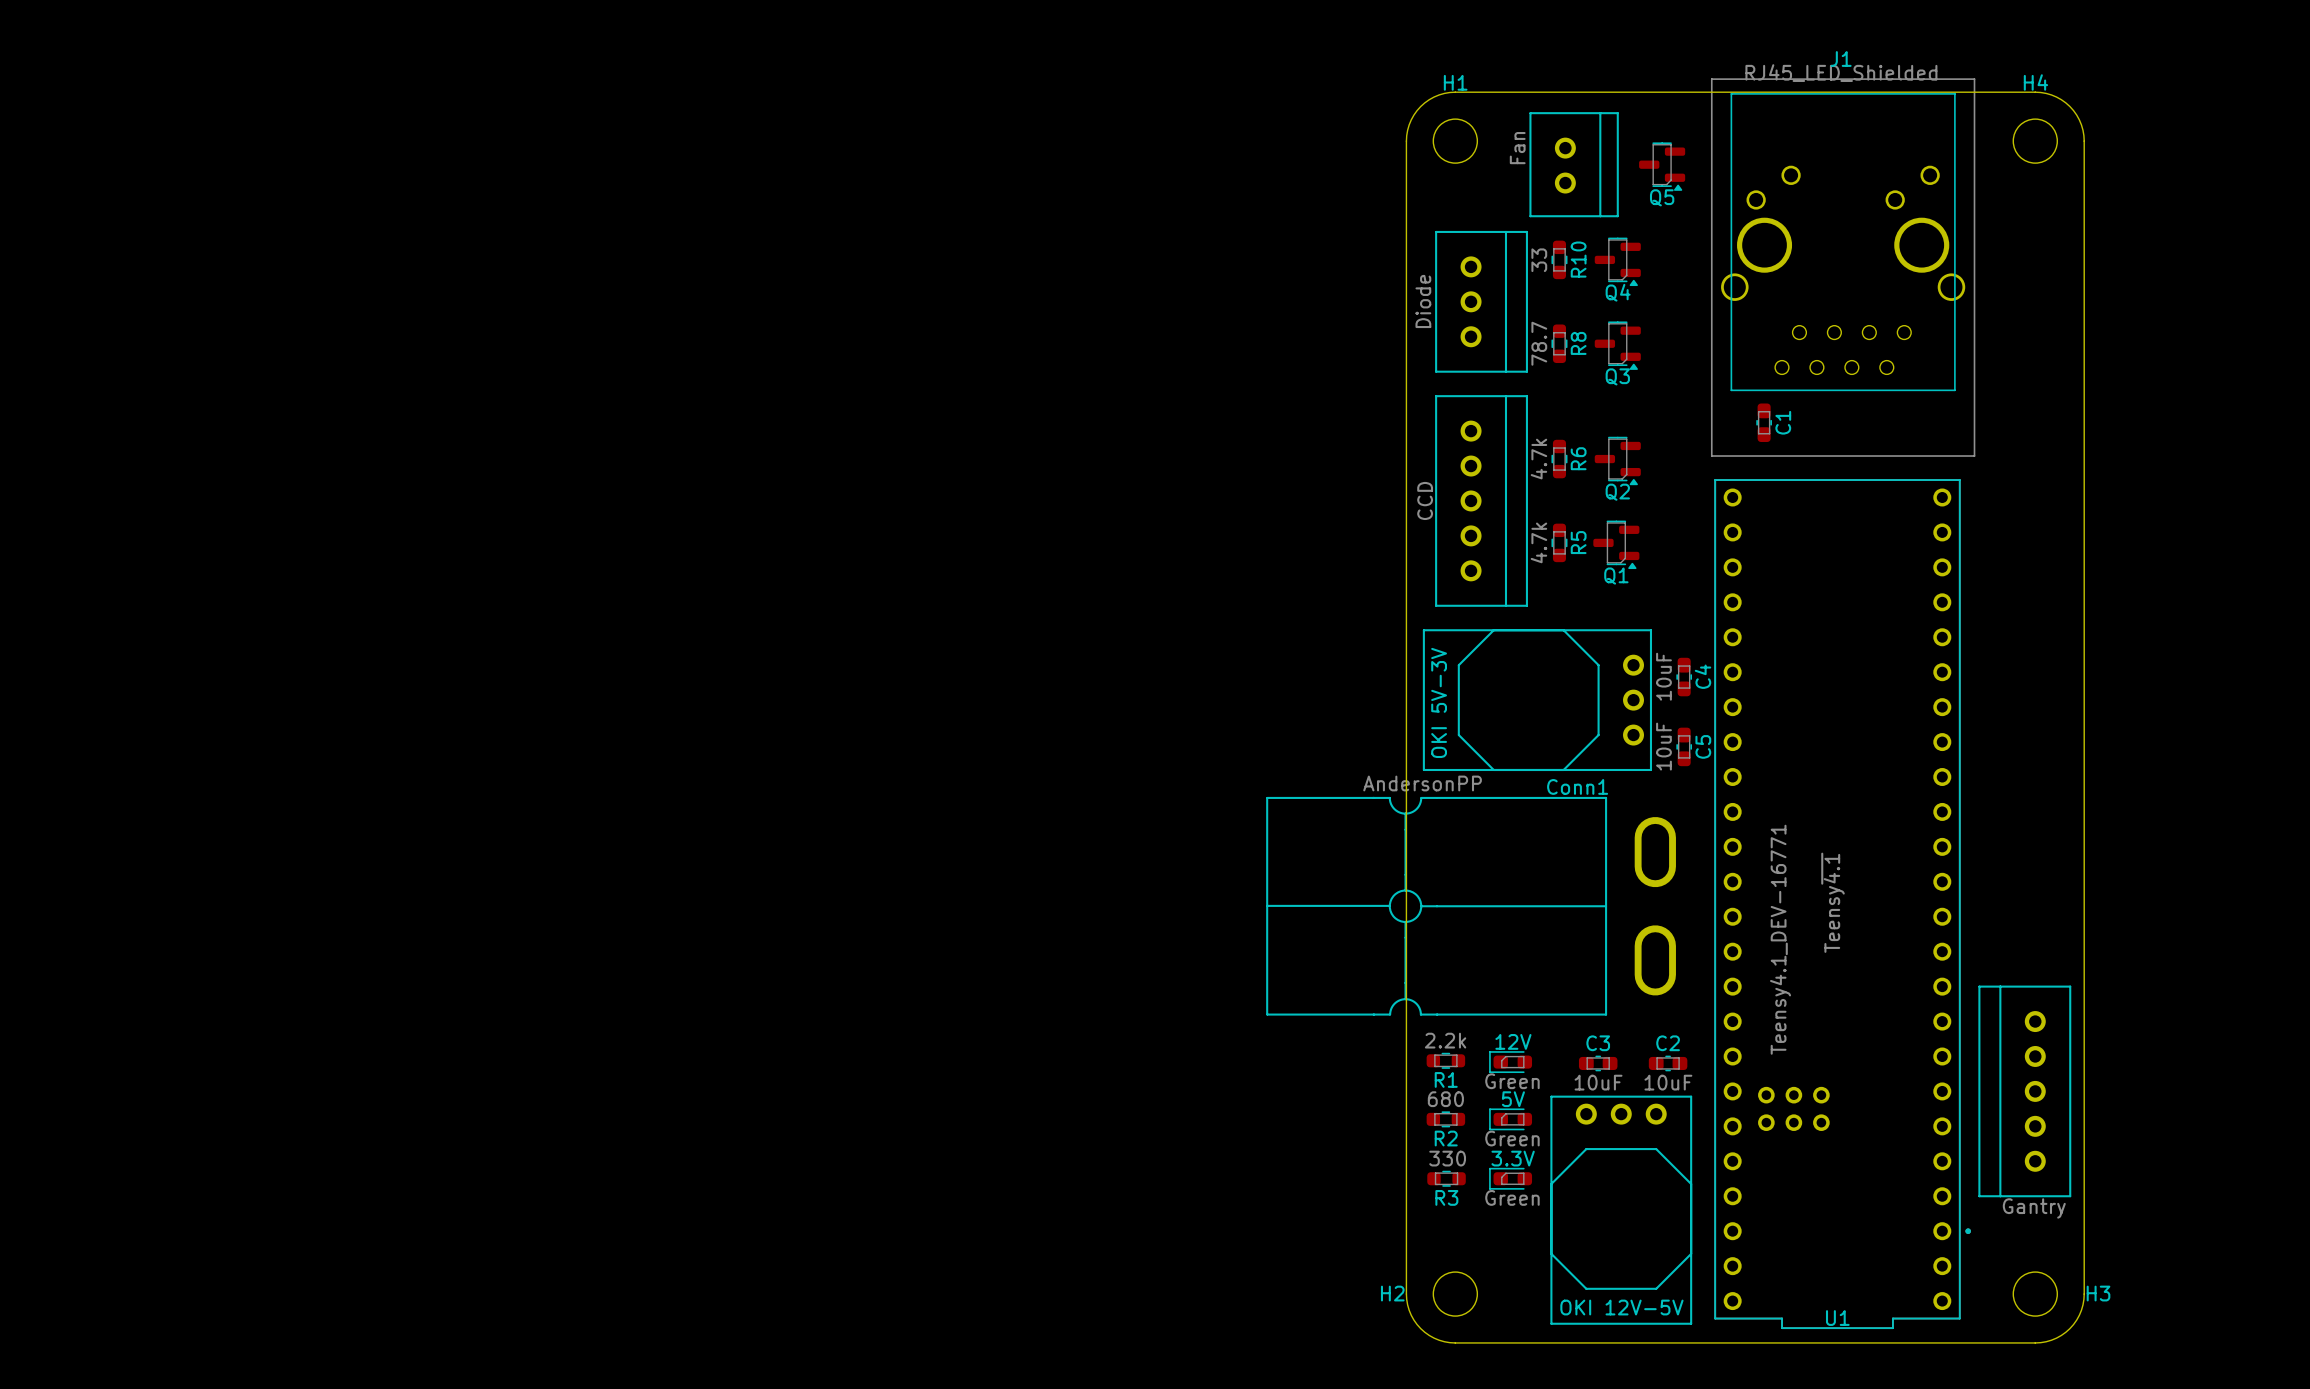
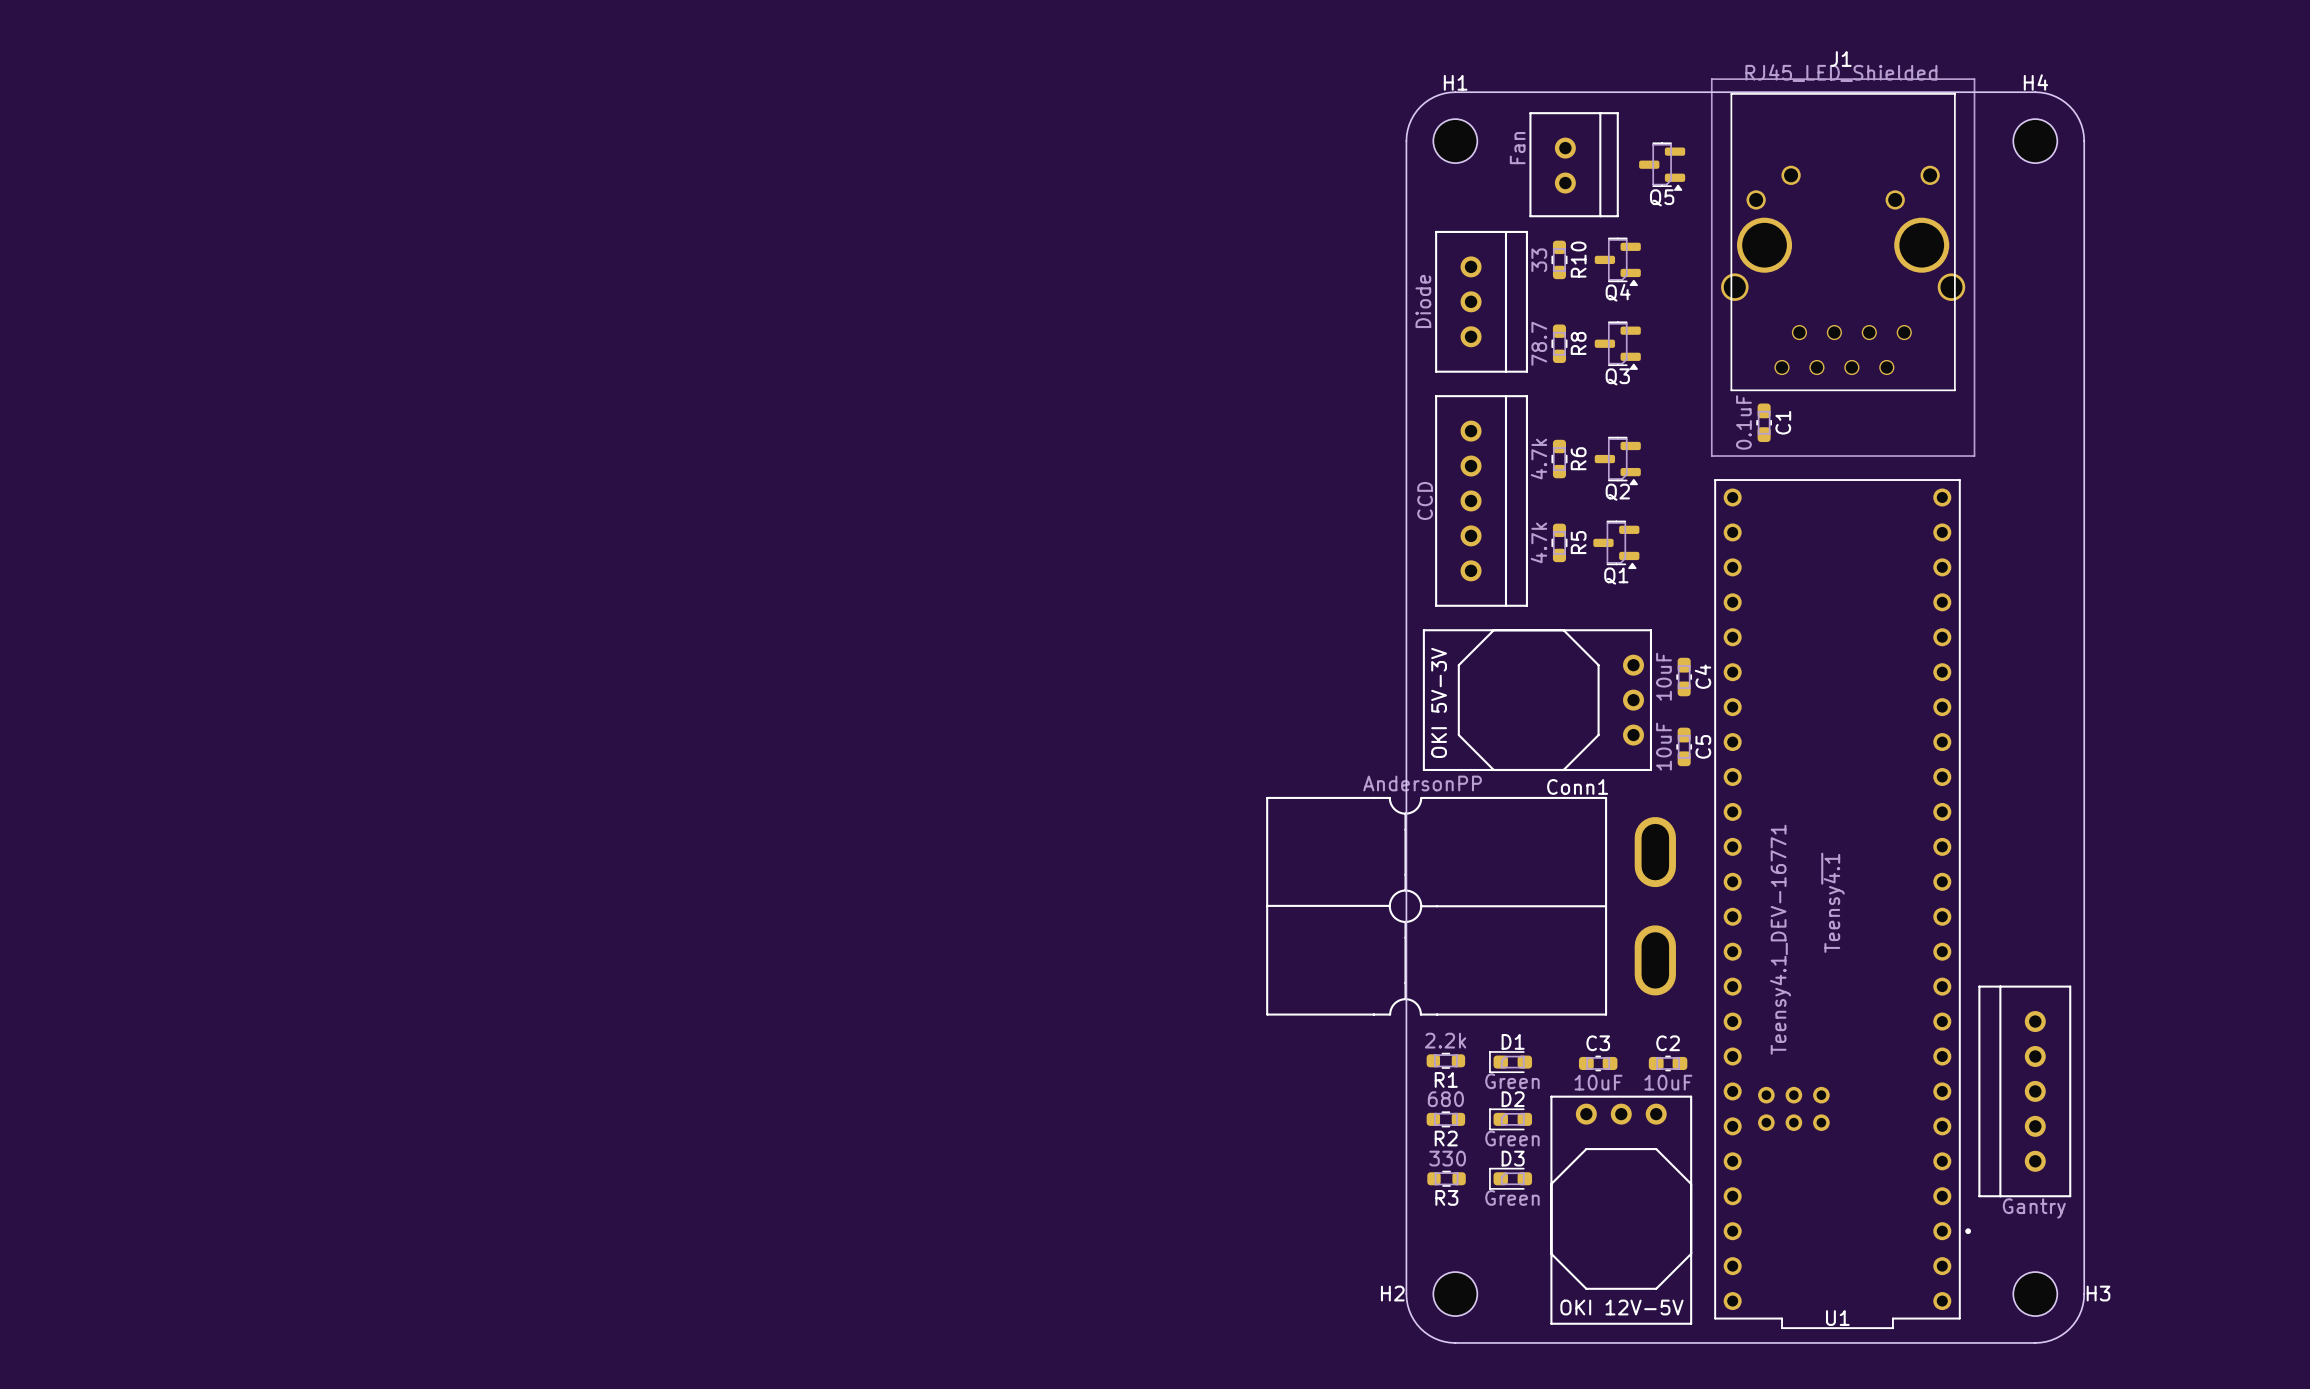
C1 value: none -> 0.1uF (1743, 422)
12V name: 12V (1513, 1041) -> D1 (1513, 1041)
5V name: 5V (1513, 1099) -> D2 (1513, 1099)
3.3V name: 3.3V (1513, 1158) -> D3 (1513, 1158)

